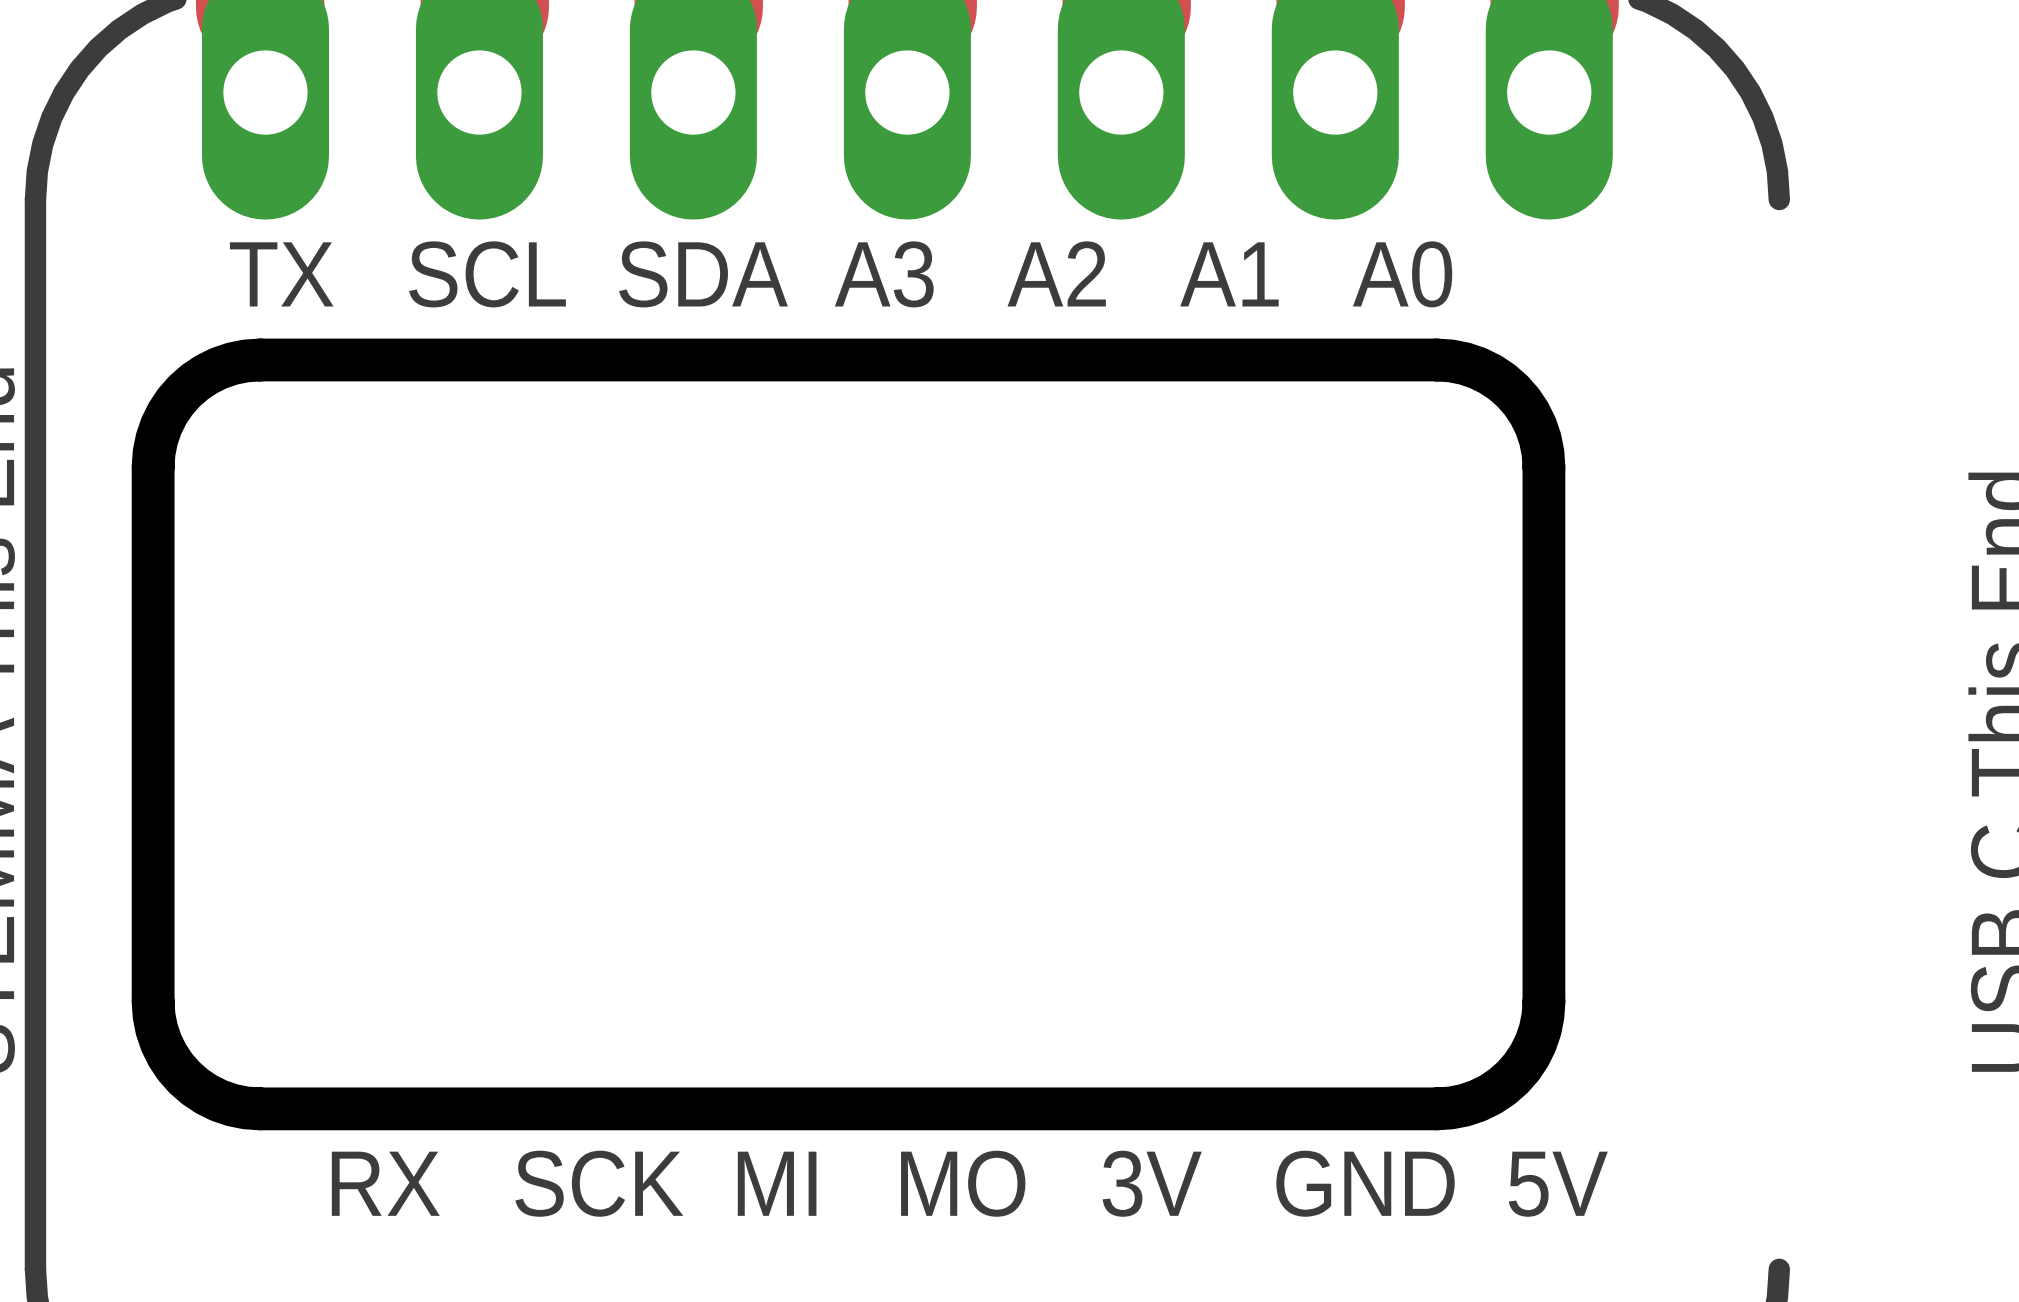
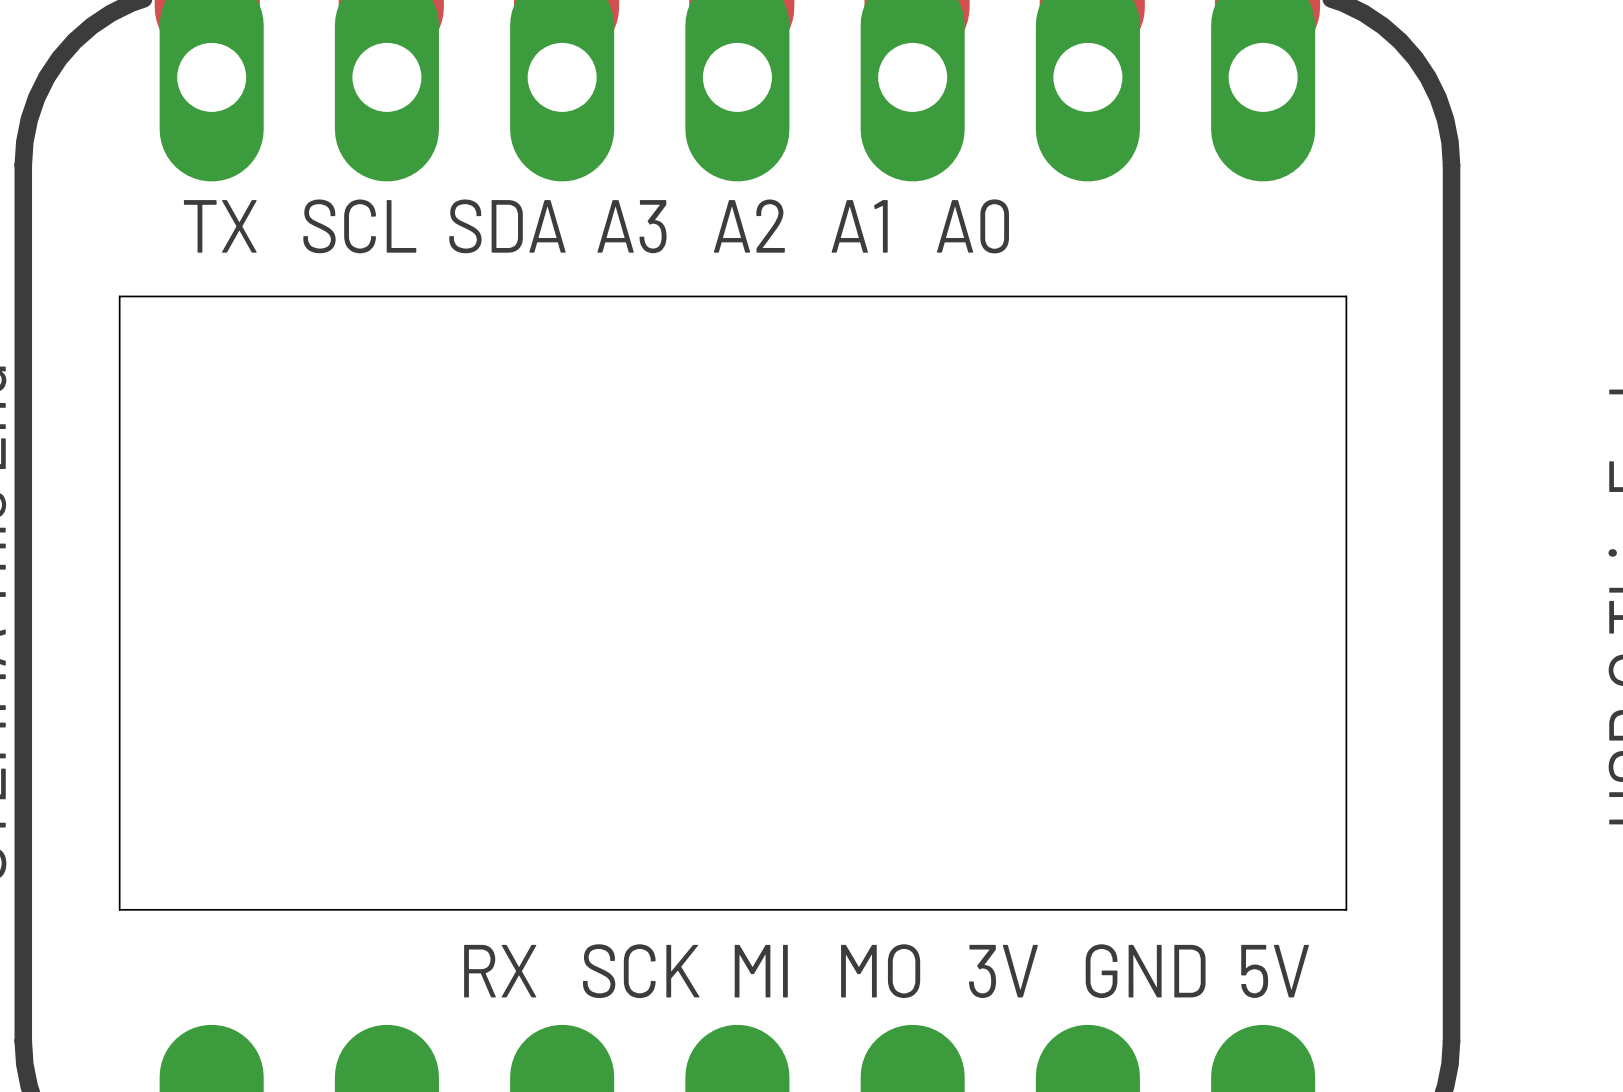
line: none -> (1451, 165) (1451, 1041)
board edge: (260, 359) (232, 363) (219, 368) (206, 374) (184, 391) (167, 413) (161, 426) (156, 439) (153, 466) -> (207, 296) (119, 296) (119, 384)
board edge width: thick (260, 359) (1436, 359) -> thin (207, 296) (1171, 296)
board edge: (1436, 359) (1464, 363) (1477, 368) (1490, 374) (1512, 391) (1529, 413) (1535, 426) (1540, 439) (1543, 466) (1543, 1015) (1540, 1029) (1529, 1055) (1521, 1067) (1502, 1086) (1490, 1094) (1464, 1105) (1436, 1108) -> (1171, 296) (1346, 296) (1346, 909) (1171, 909)
board edge width: thick (153, 466) (153, 1001) -> thin (119, 384) (119, 822)
board edge: (153, 1001) (156, 1029) (161, 1042) (167, 1055) (184, 1077) (206, 1094) (219, 1100) (232, 1105) (260, 1108) -> (119, 822) (119, 909) (207, 909)
board edge width: thick (260, 1108) (1436, 1108) -> thin (207, 909) (1171, 909)

